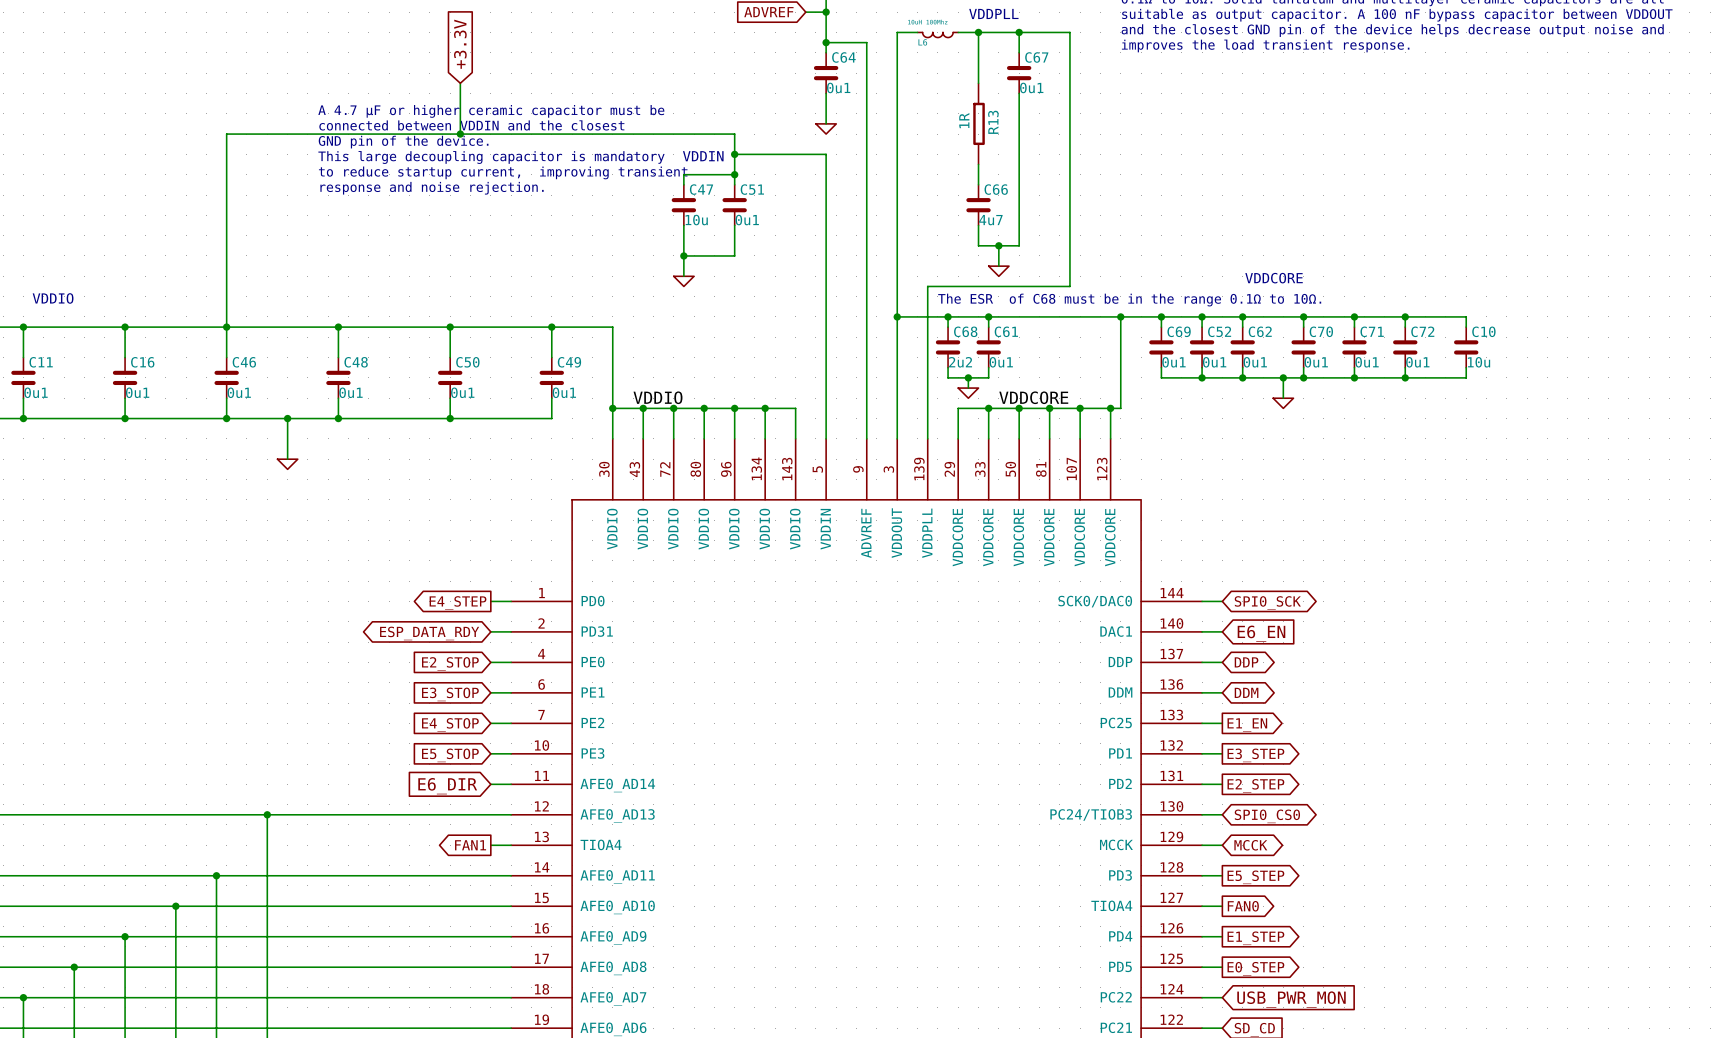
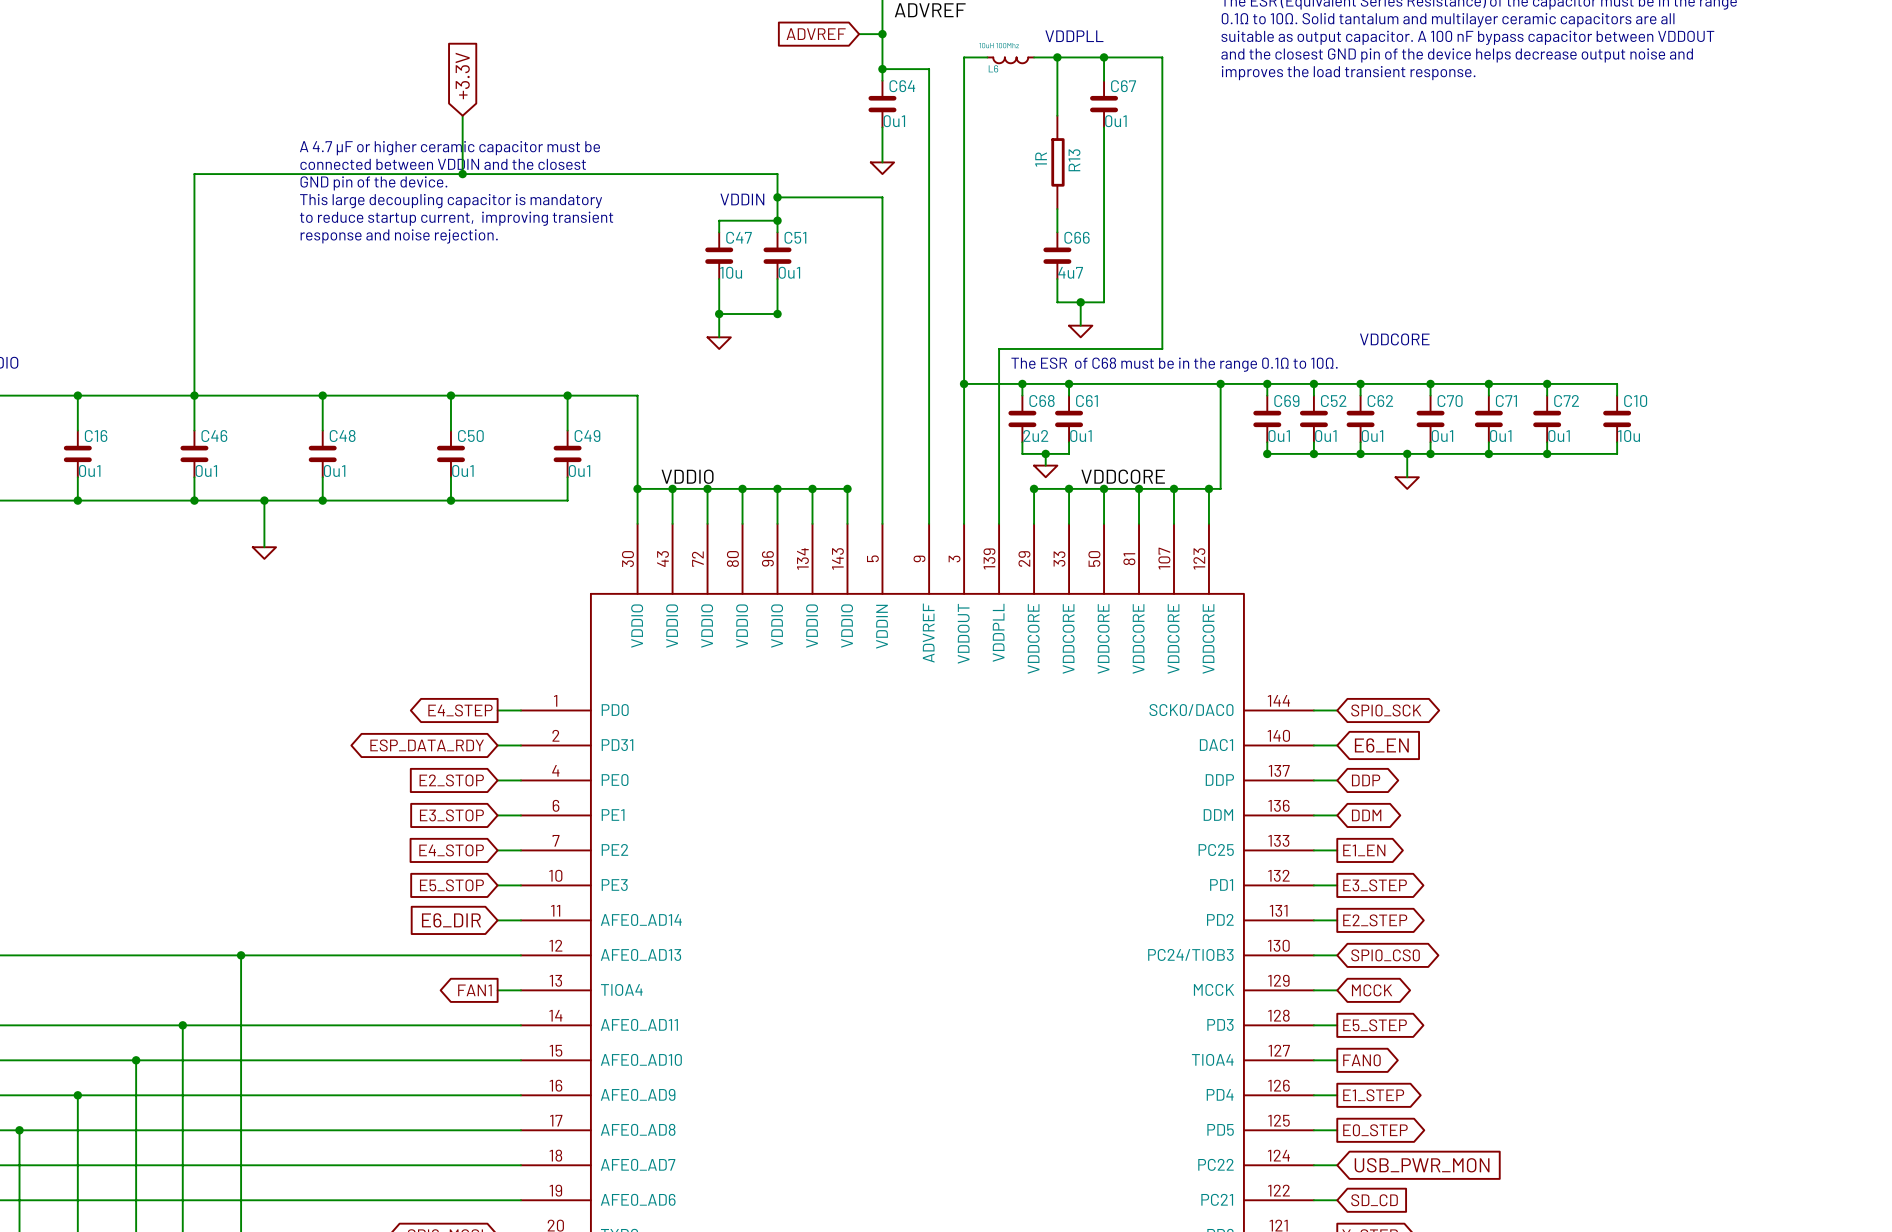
junction: none -> (777, 314)
junction: none -> (1267, 453)
junction: none -> (847, 488)
junction: none -> (1034, 488)

